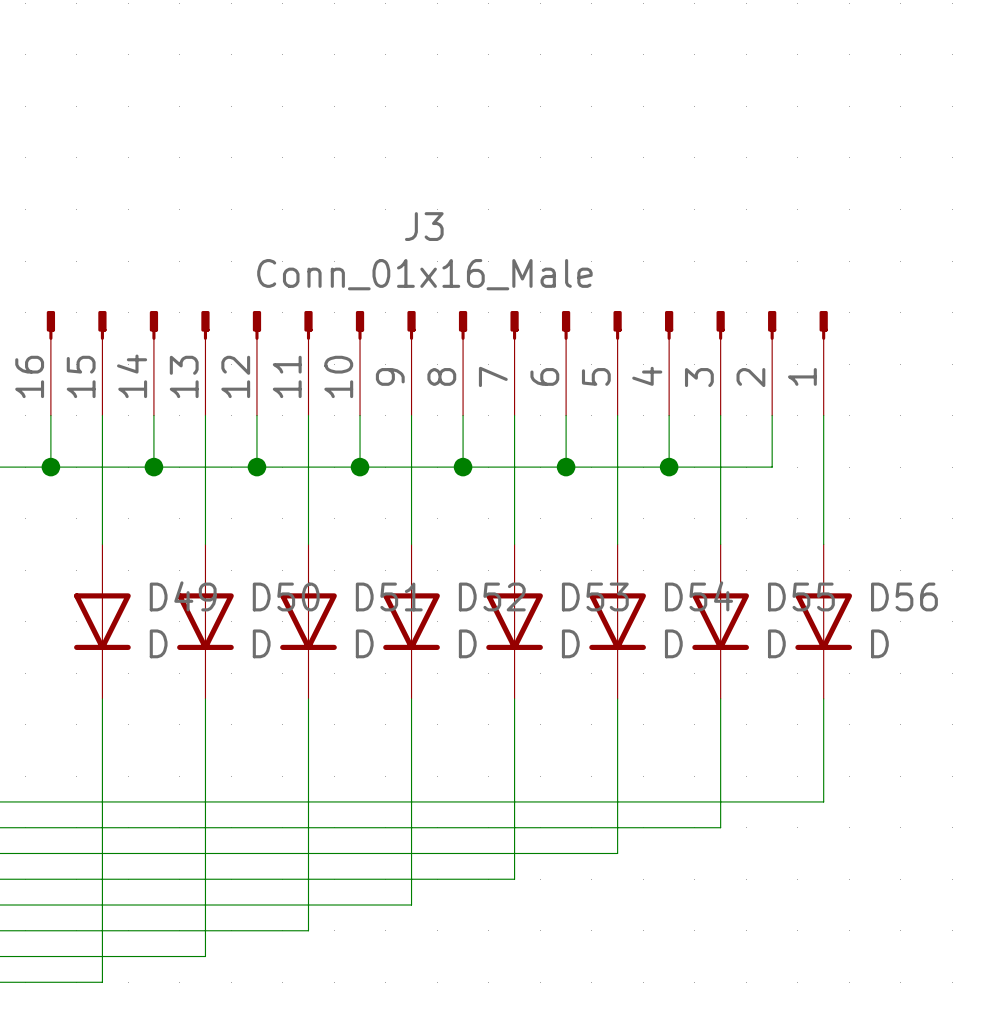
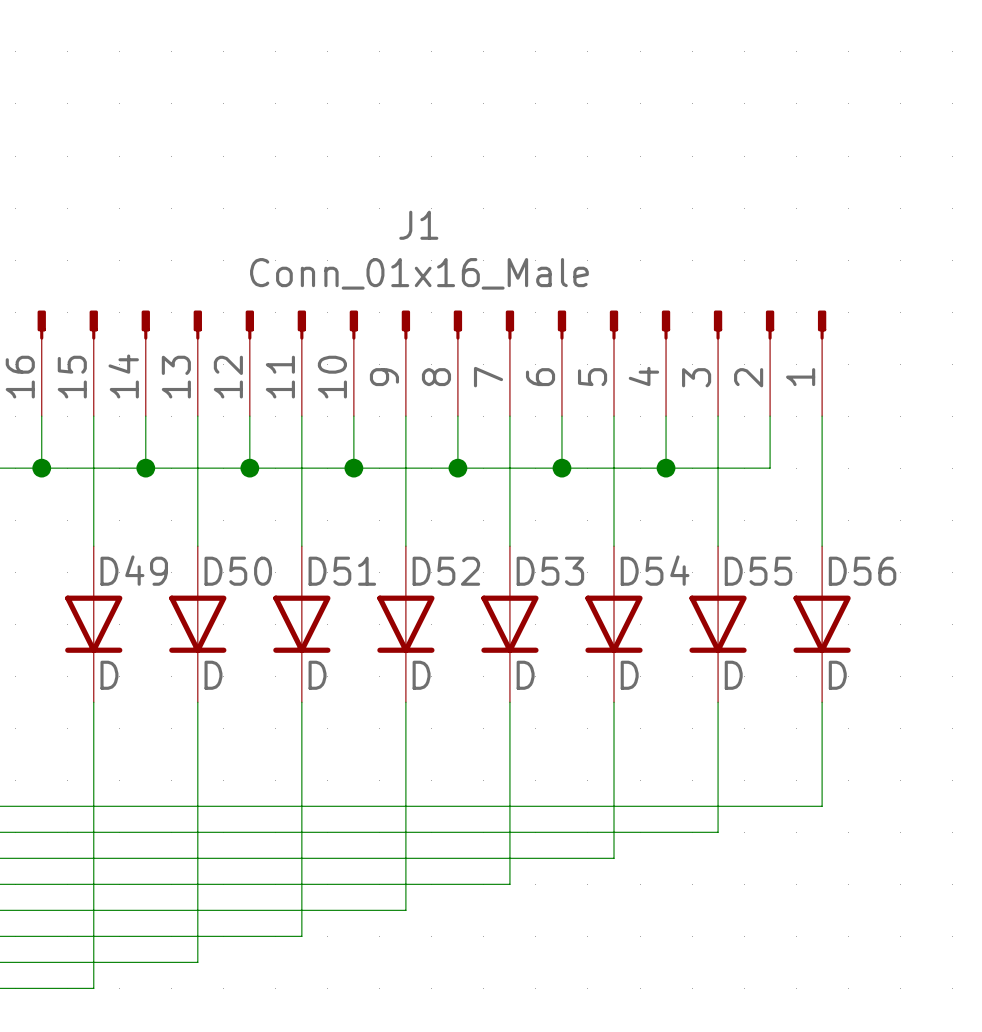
J3 name: J3 (424, 226) -> J1 (418, 225)
D49 name position: D49 (183, 596) -> D49 (134, 570)
D50 name position: D50 (286, 596) -> D50 (238, 571)
D51 name position: D51 (389, 596) -> D51 (342, 571)
D52 name position: D52 (492, 596) -> D52 (446, 571)
D53 name position: D53 (595, 596) -> D53 (550, 571)
D54 name position: D54 (698, 596) -> D54 (655, 570)
D55 name position: D55 (801, 596) -> D55 (758, 571)
D56 name position: D56 (904, 596) -> D56 (862, 571)
D49 value position: D (158, 643) -> D (109, 675)
D50 value position: D (261, 643) -> D (213, 675)
D51 value position: D (364, 643) -> D (317, 675)
D52 value position: D (467, 643) -> D (421, 675)
D53 value position: D (570, 643) -> D (525, 675)
D54 value position: D (673, 643) -> D (629, 675)
D55 value position: D (776, 643) -> D (733, 675)
D56 value position: D (879, 643) -> D (837, 675)

